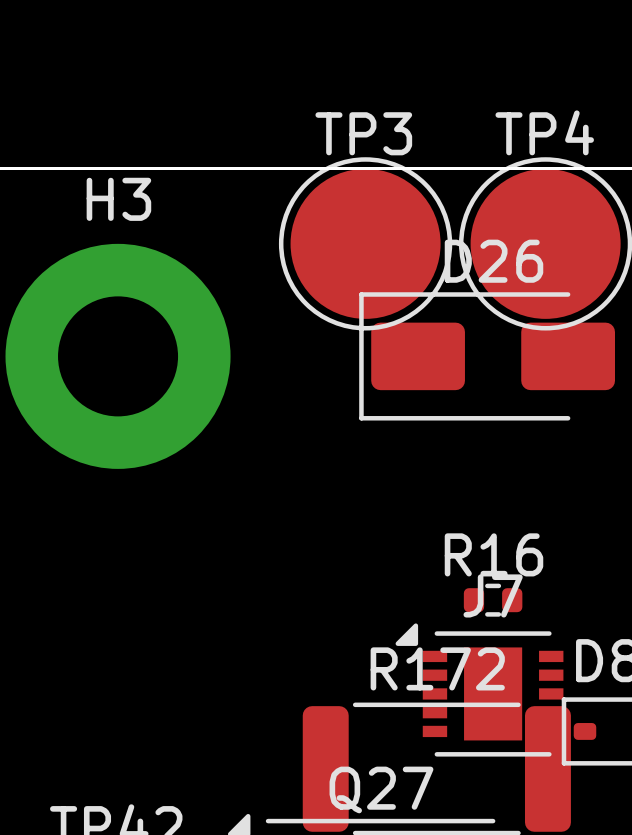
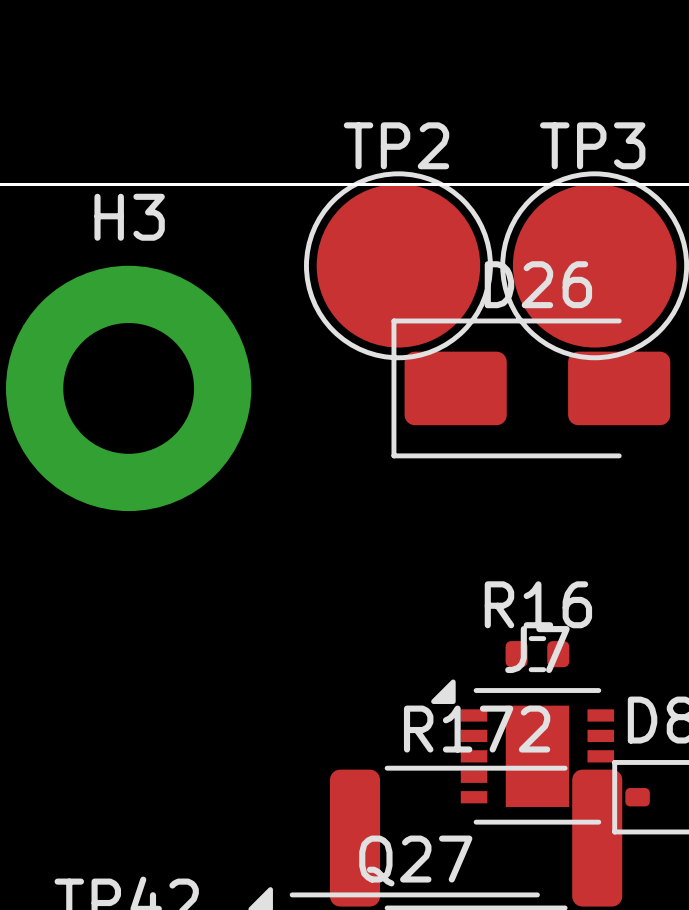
TP4 name: TP4 (544, 132) -> TP3 (592, 145)
TP3 name: TP3 (363, 133) -> TP2 (396, 145)

